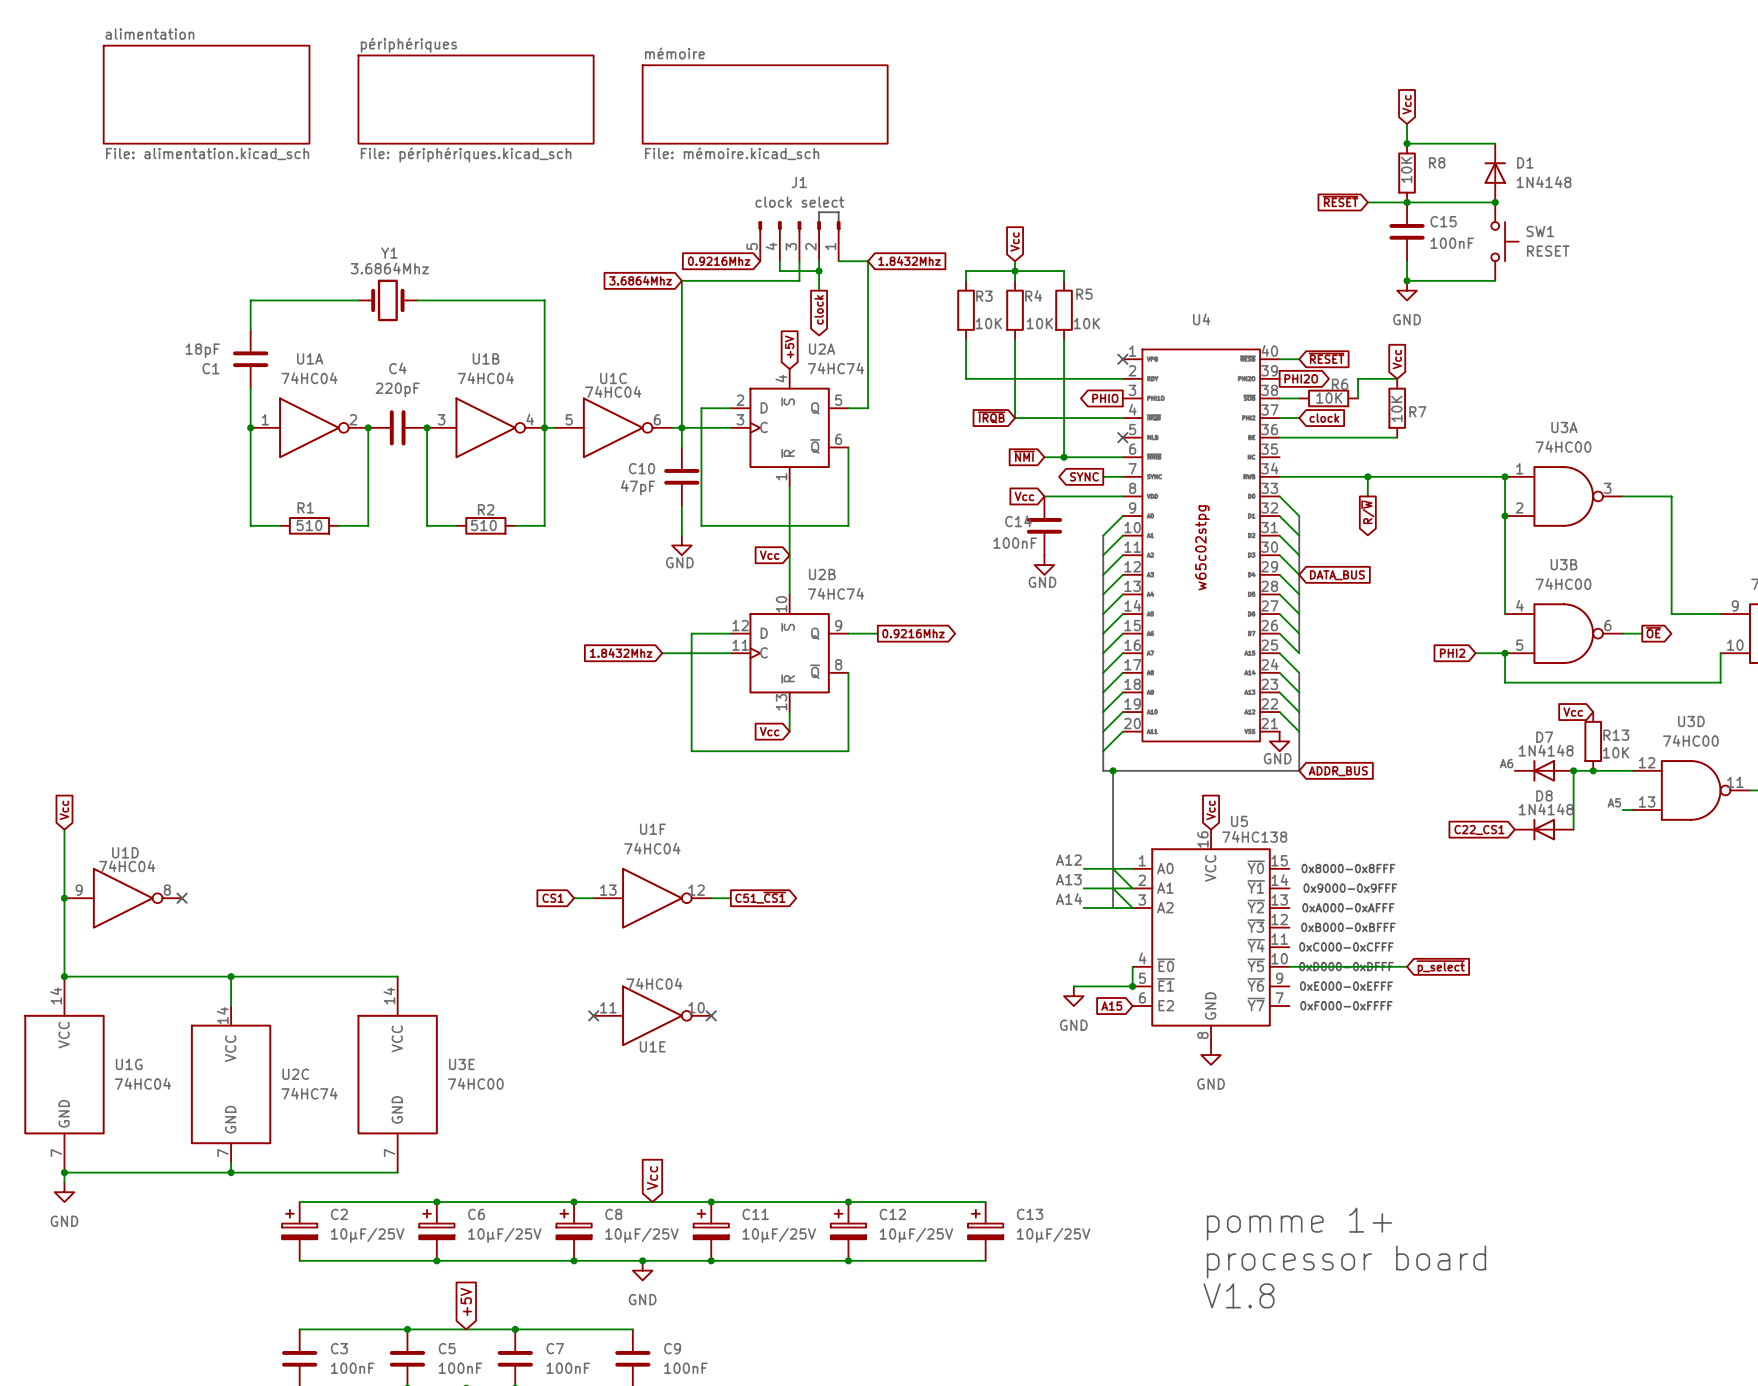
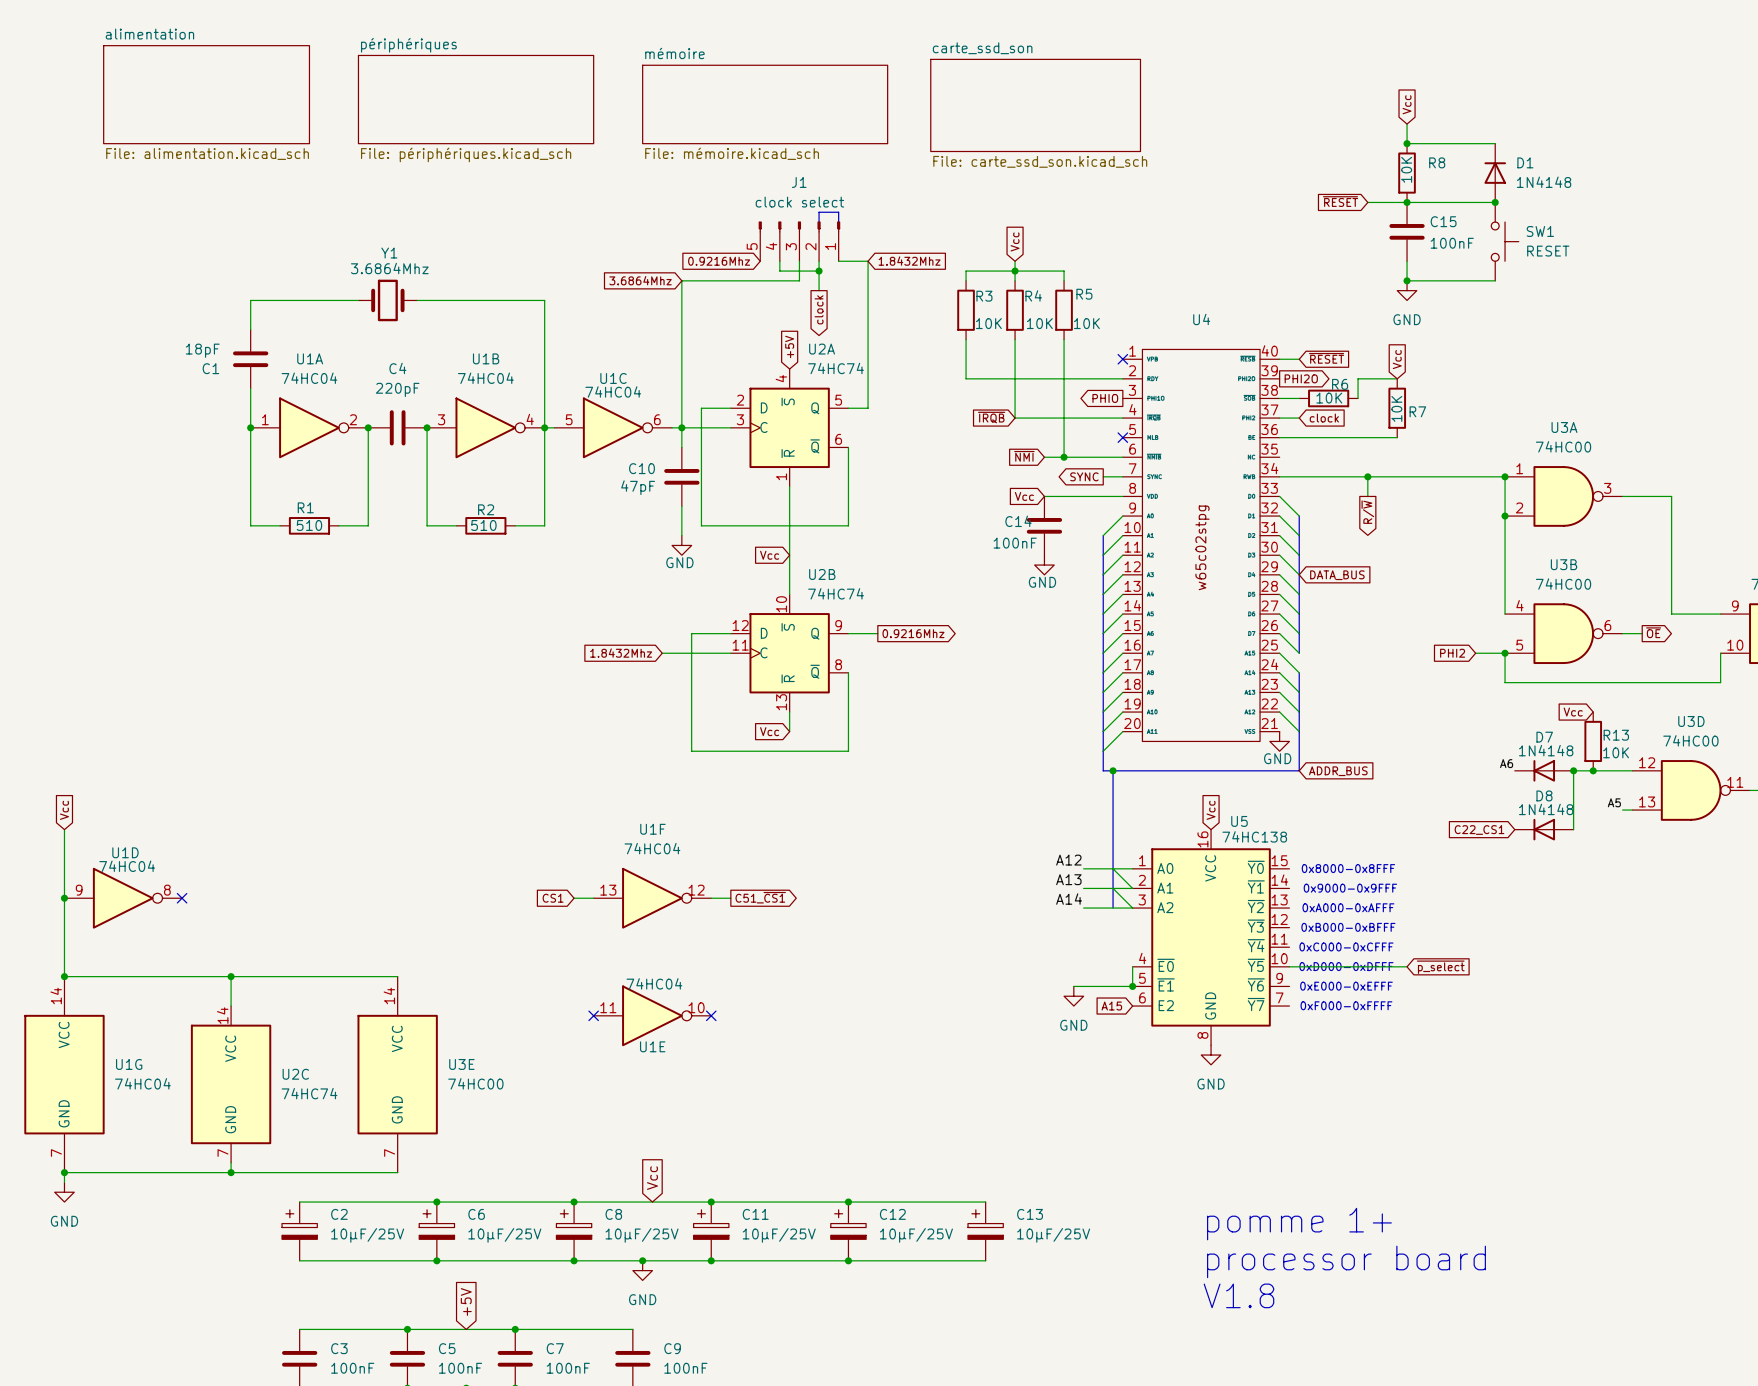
sheet carte_ssd_son: none -> File: carte_ssd_son.kicad_sch (1035, 105)

